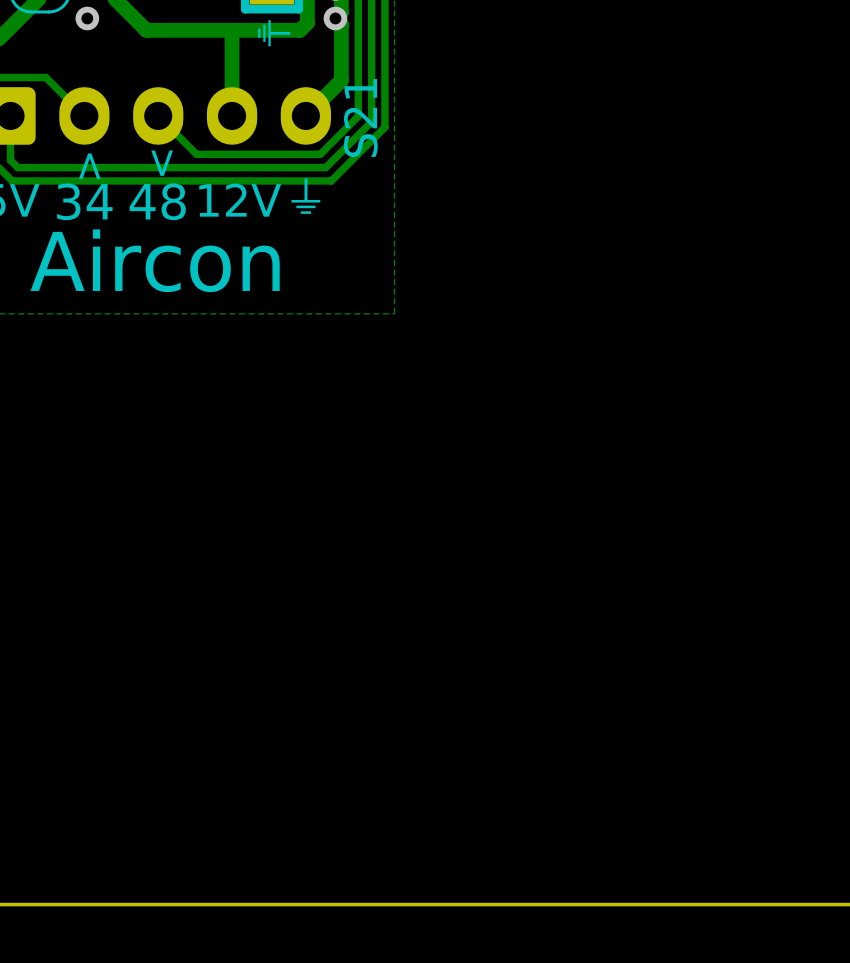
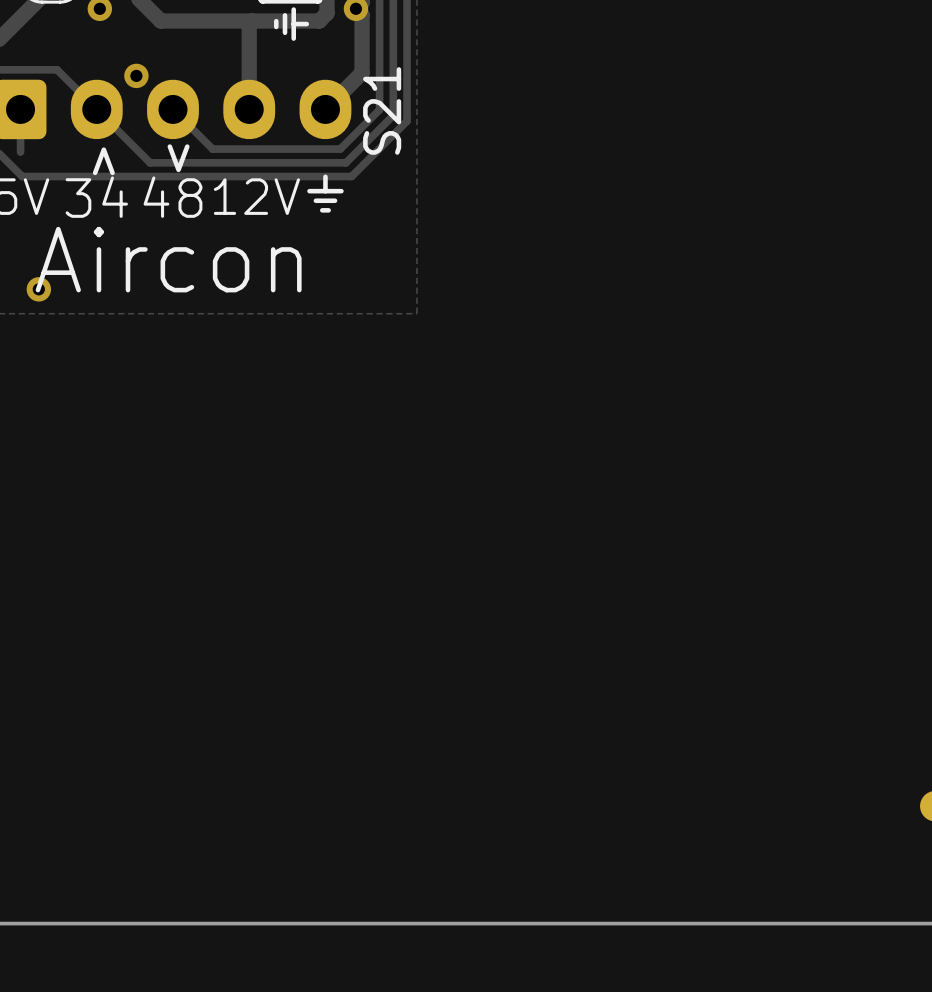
via: none -> (136, 75)
track: (10, 157) (10, 160) (17, 167) (136, 167) -> (96, 109) (150, 162)
via: none -> (38, 289)

